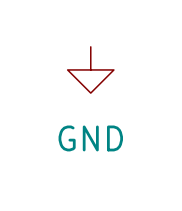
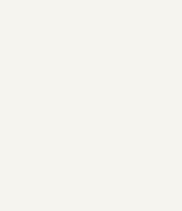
power symbol: GND (90, 69) -> none

